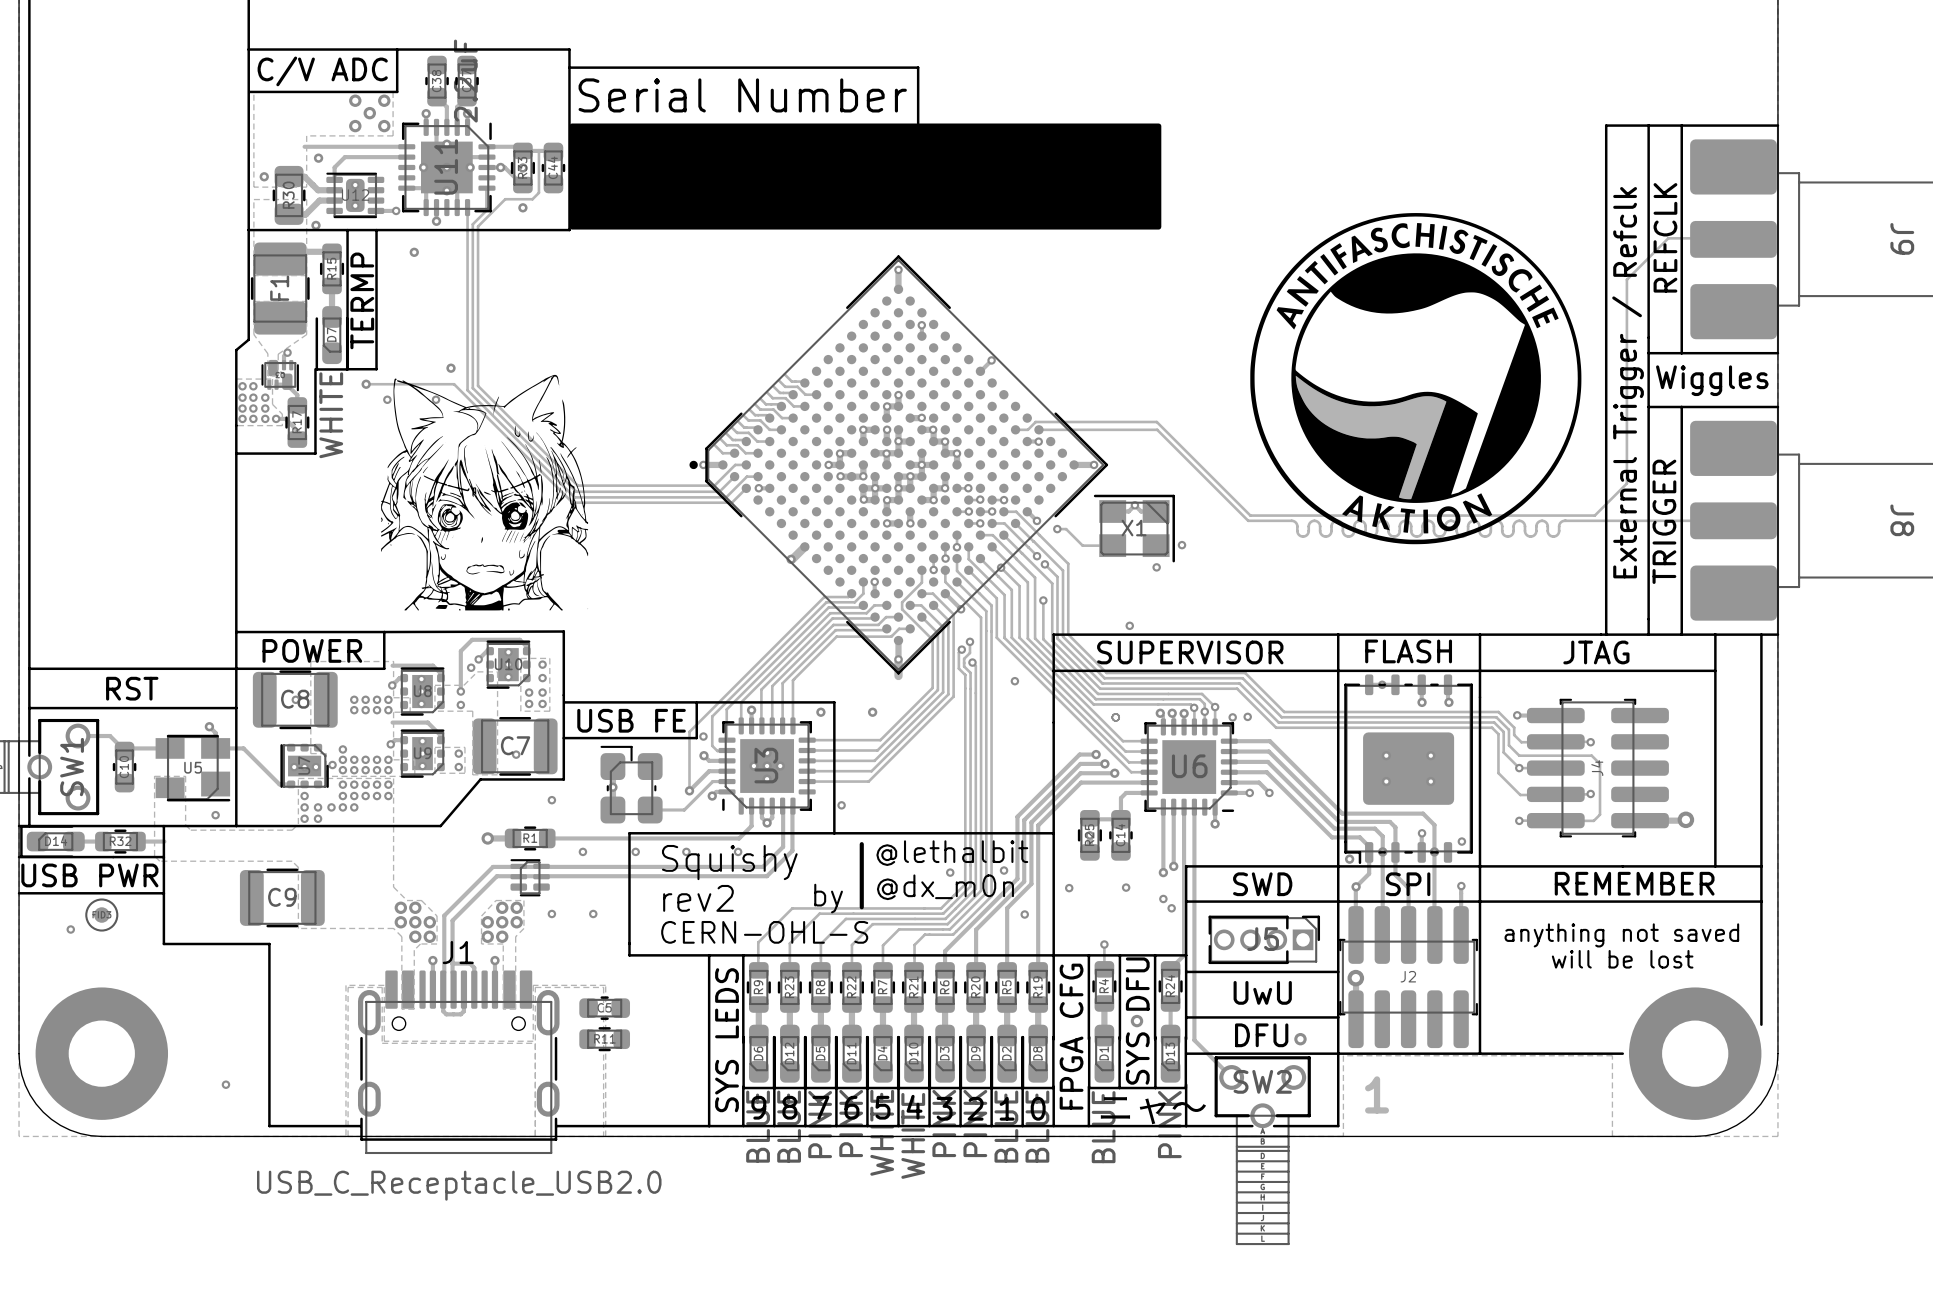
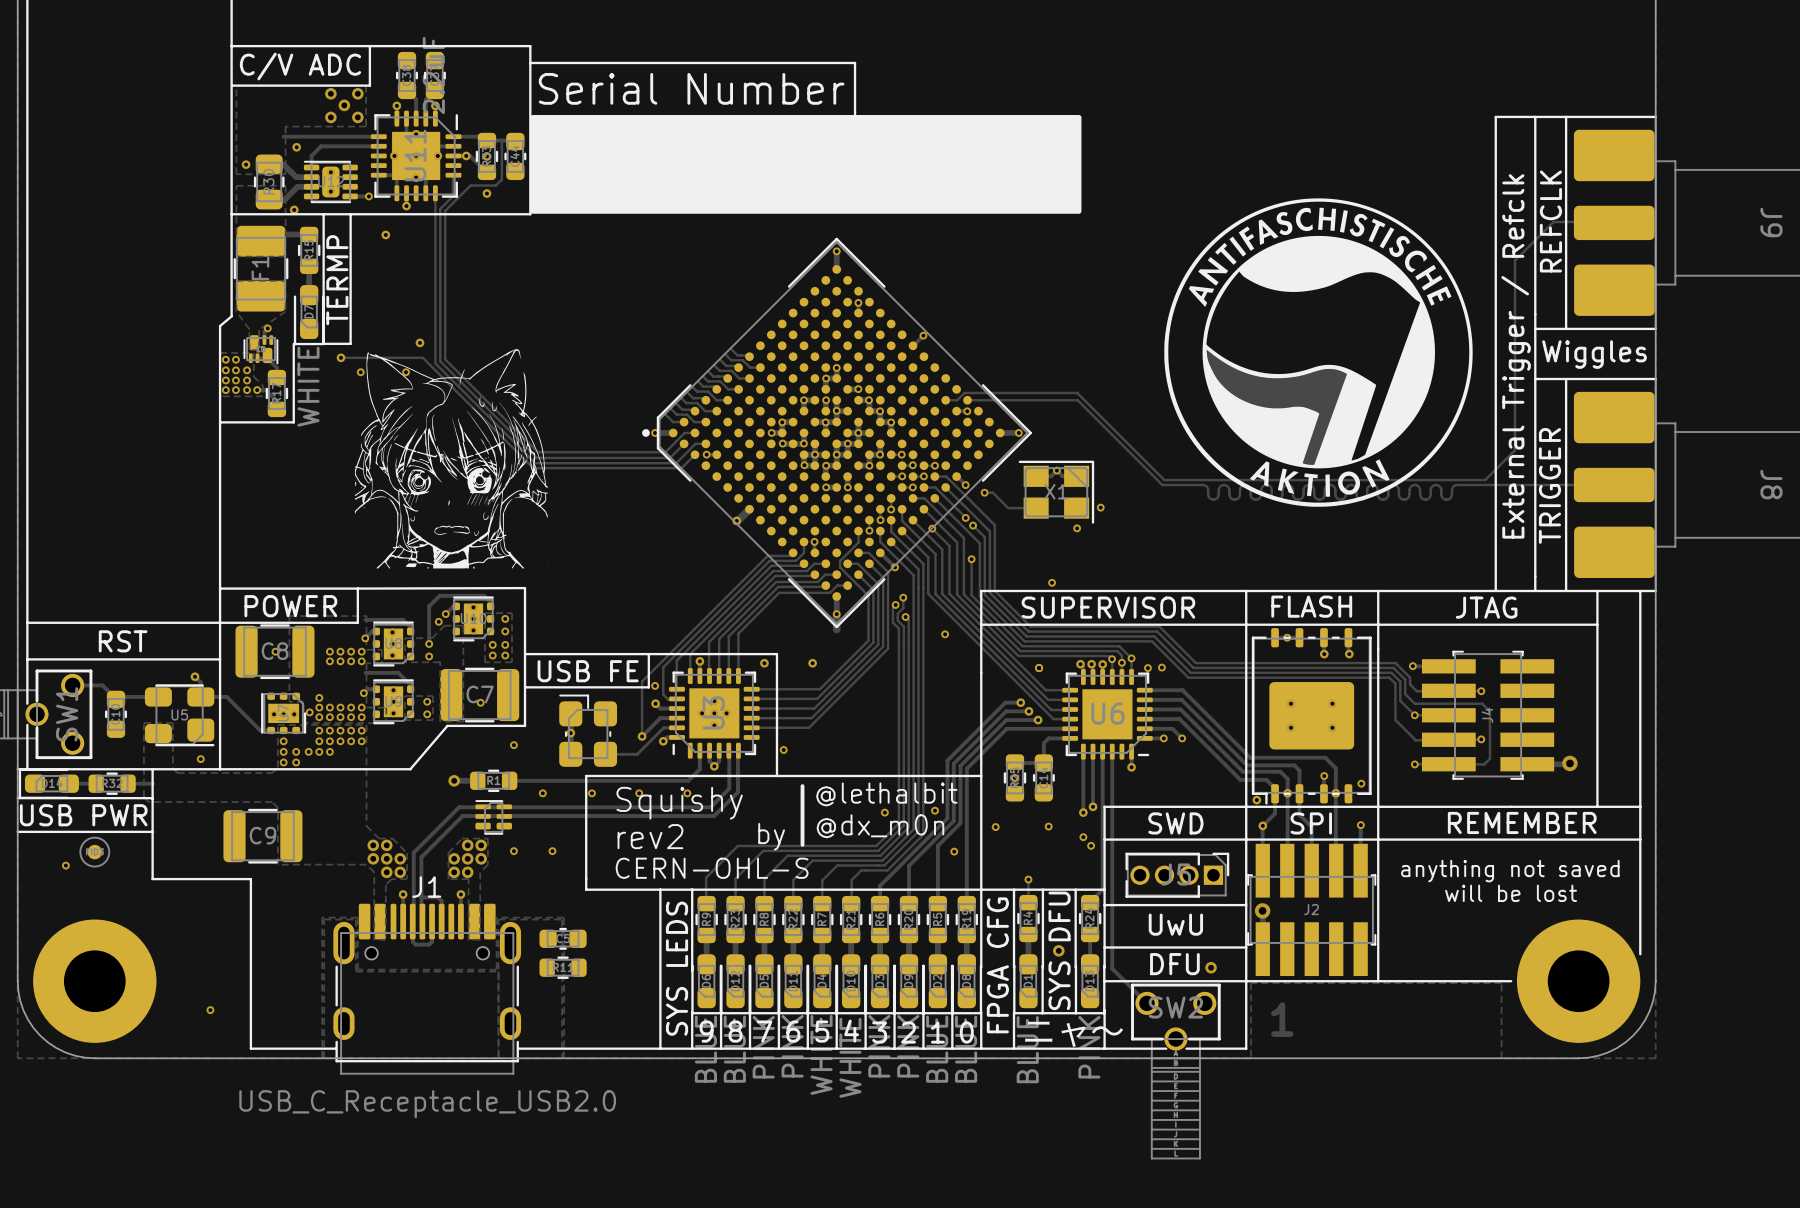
J4 footprint: [1526, 698, 1669, 838] -> [1421, 650, 1555, 780]
U5 footprint: [155, 734, 231, 802] -> [144, 684, 215, 747]
J2 footprint: [1339, 906, 1478, 1049] -> [1247, 843, 1377, 977]

